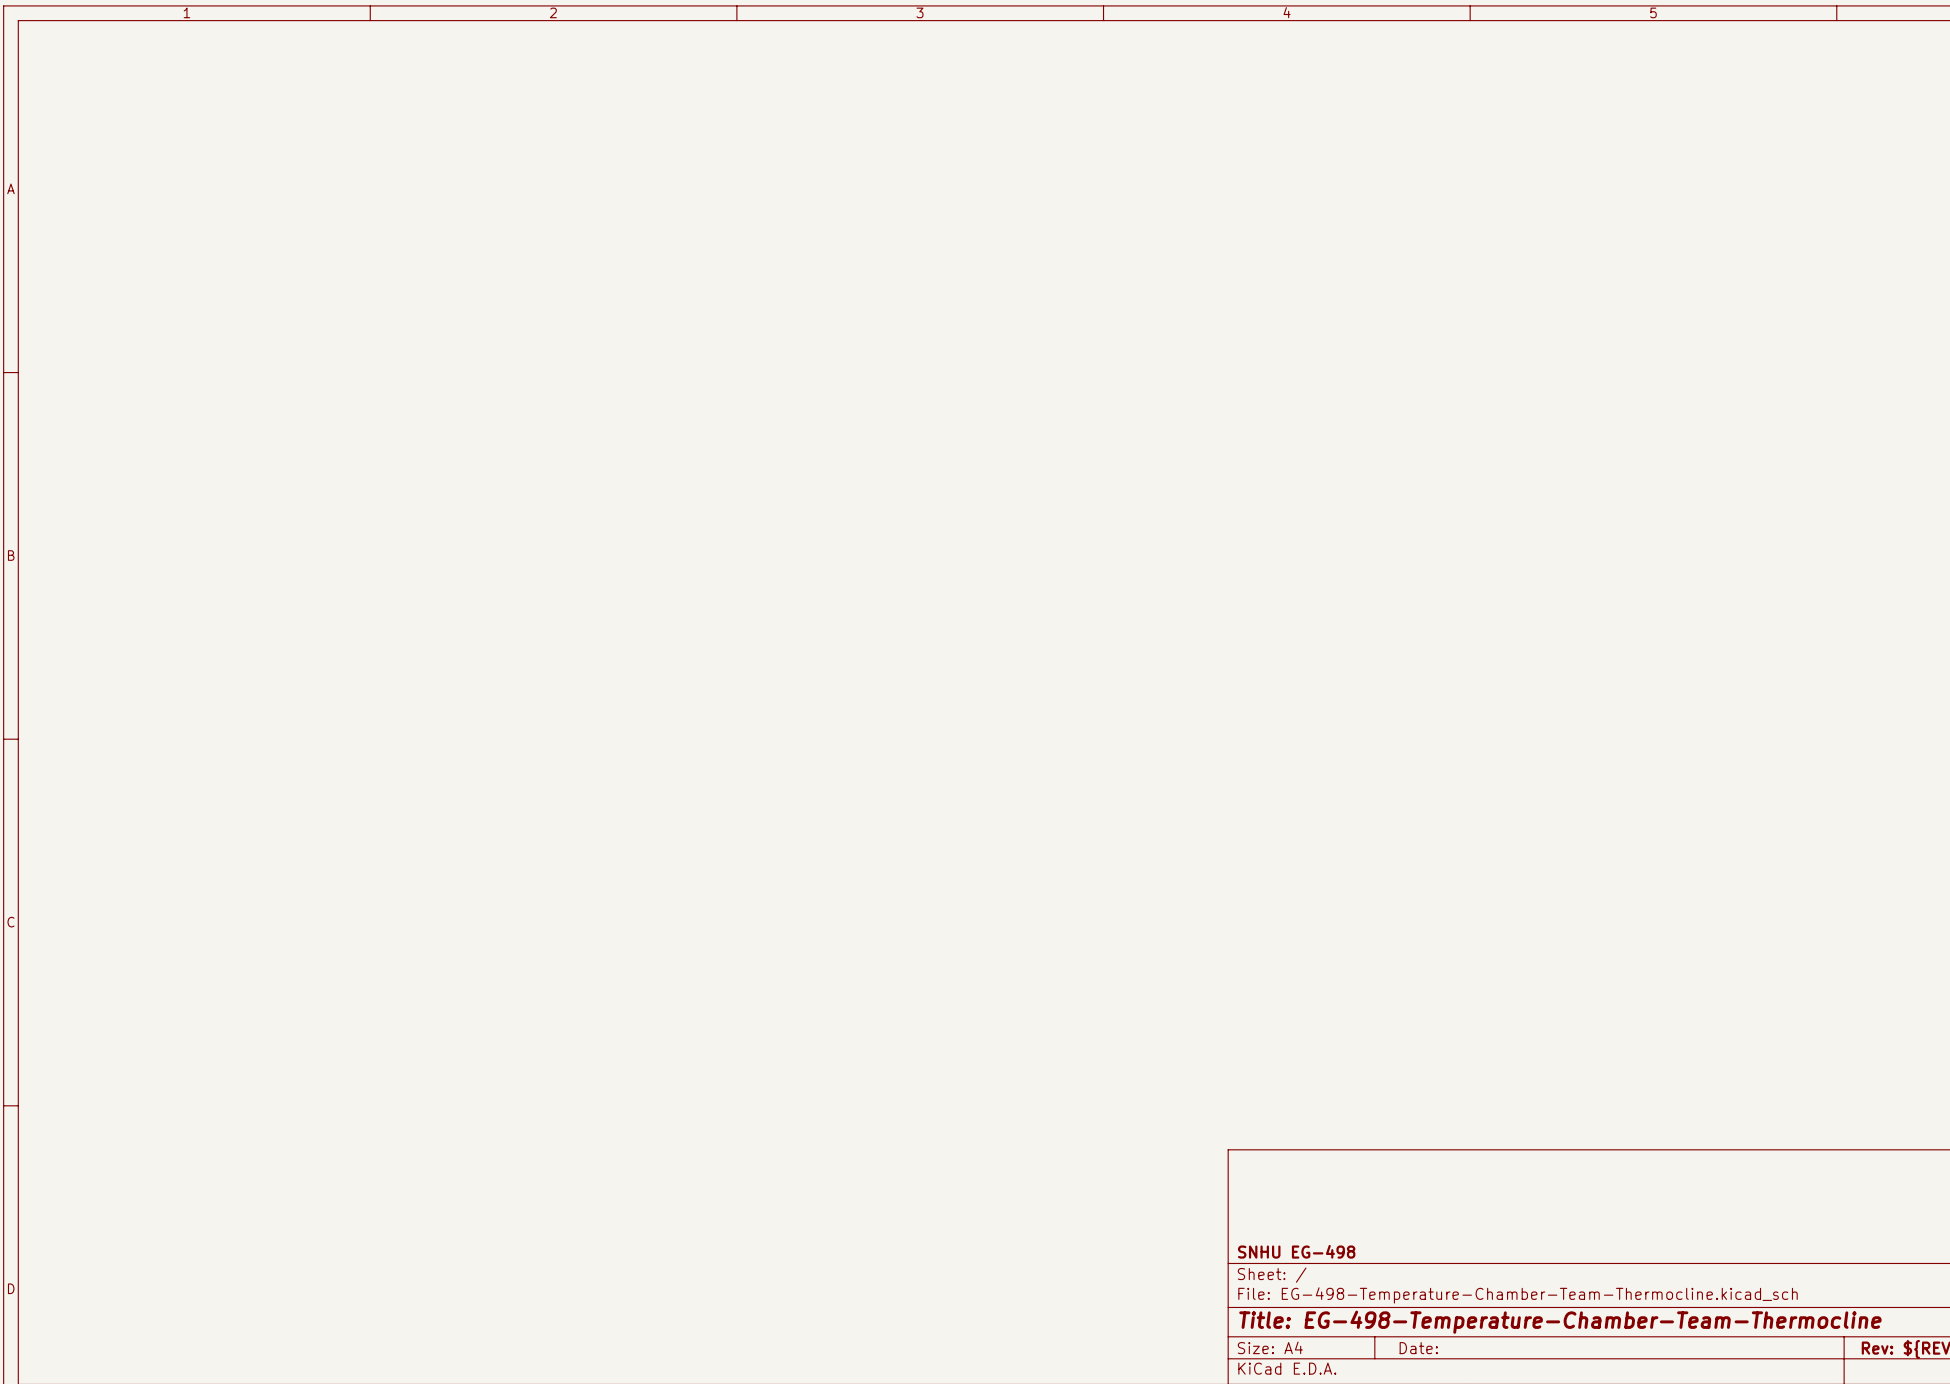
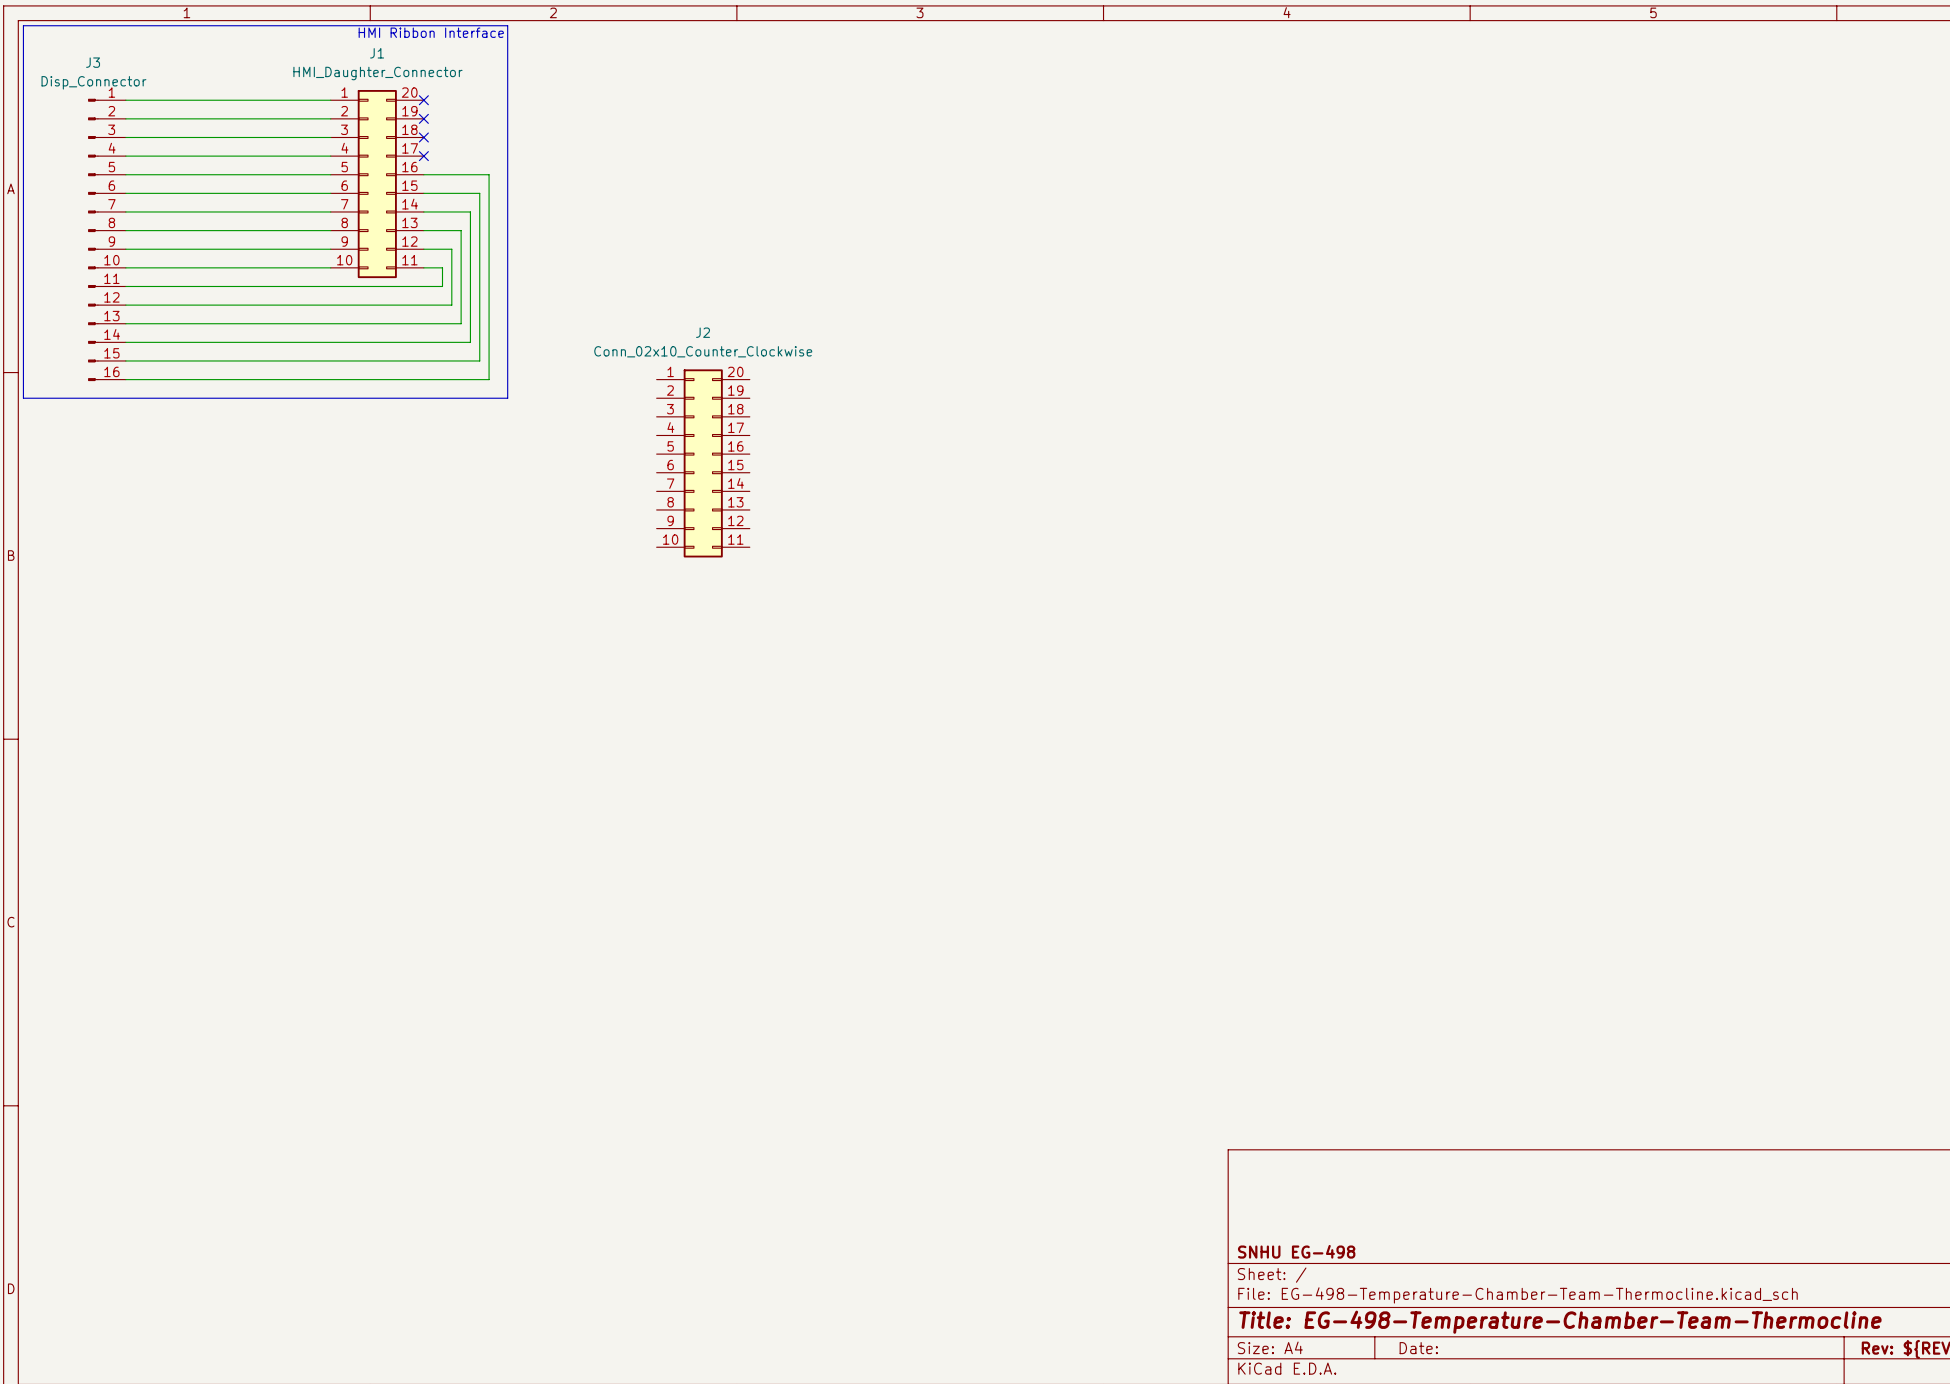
line: none -> (23, 25) (507, 25) (507, 398) (23, 398) (23, 25)
text: none -> HMI Ribbon Interface (431, 32)
wire: none -> (125, 100) (330, 100)
no-connect mark: none -> (423, 100)
wire: none -> (125, 118) (330, 118)
no-connect mark: none -> (423, 118)
wire: none -> (125, 137) (330, 137)
no-connect mark: none -> (423, 137)
wire: none -> (125, 156) (330, 156)
no-connect mark: none -> (423, 156)
wire: none -> (125, 174) (330, 174)
wire: none -> (423, 174) (489, 174) (489, 379) (125, 379)
J1: none -> HMI_Daughter_Connector (377, 184)
wire: none -> (125, 193) (330, 193)
wire: none -> (423, 193) (479, 193) (479, 360) (125, 360)
wire: none -> (125, 211) (330, 211)
wire: none -> (423, 211) (470, 211) (470, 342) (125, 342)
wire: none -> (125, 230) (330, 230)
wire: none -> (423, 230) (461, 230) (461, 323) (125, 323)
J3: none -> Disp_Connector (106, 239)
wire: none -> (125, 249) (330, 249)
wire: none -> (423, 249) (451, 249) (451, 305) (125, 305)
wire: none -> (125, 267) (330, 267)
wire: none -> (423, 267) (442, 267) (442, 286) (125, 286)
J2: none -> Conn_02x10_Counter_Clockwise (703, 463)

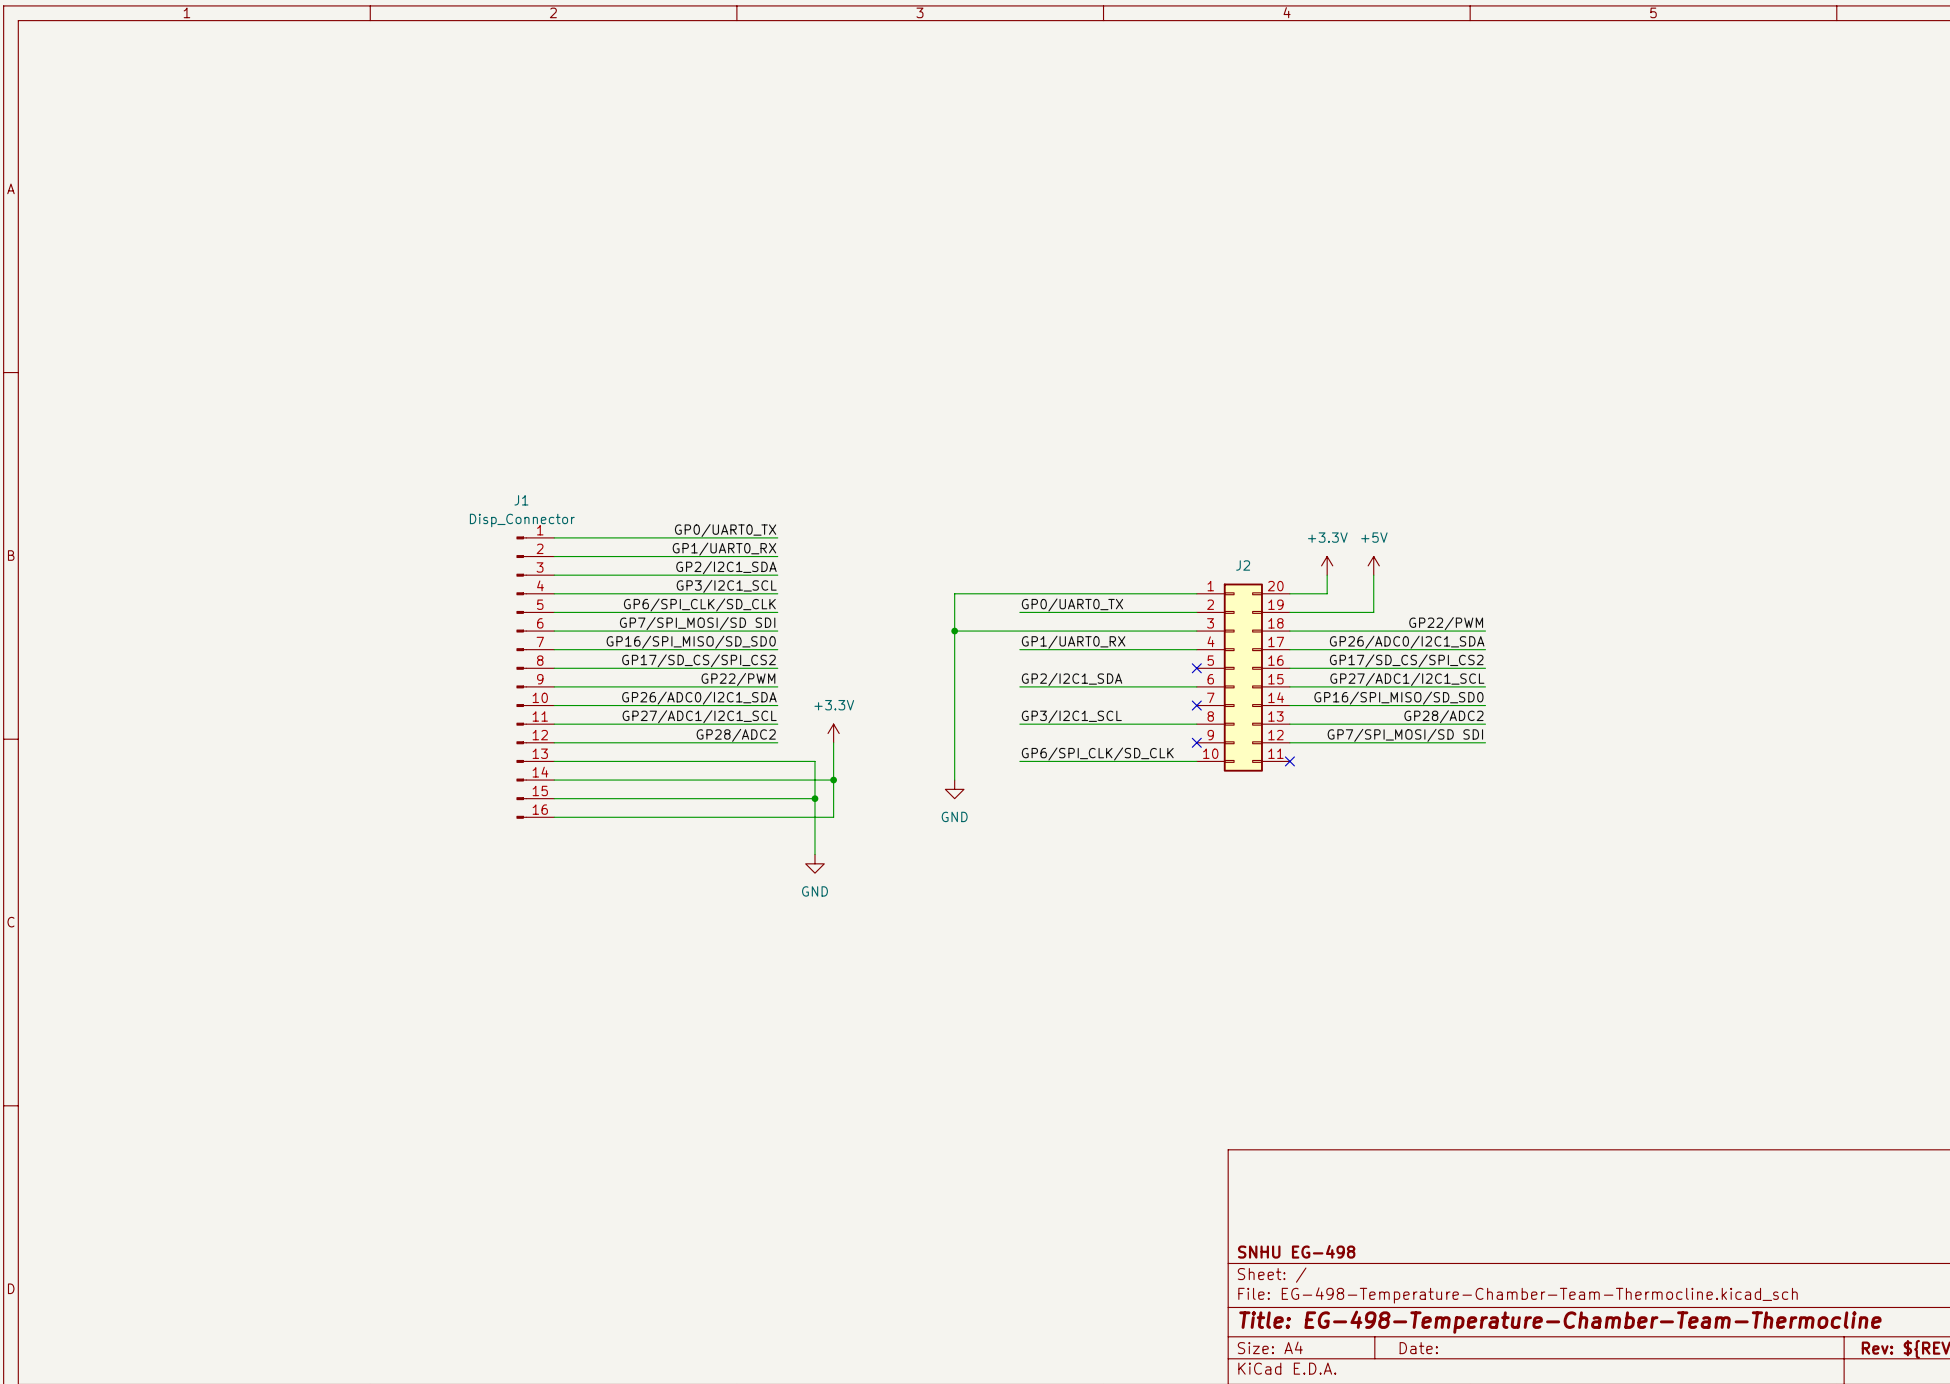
line: (23, 25) (507, 25) (507, 398) (23, 398) (23, 25) -> none
text: HMI Ribbon Interface (431, 32) -> none
J1 name position: J1 (377, 53) -> J1 (521, 500)
J1 value: HMI_Daughter_Connector (377, 73) -> Disp_Connector (522, 520)
J1 symbol: [330, 89, 424, 279] -> [516, 536, 555, 819]
wire: (125, 100) (330, 100) -> none
no-connect mark: (423, 100) -> none
wire: (125, 118) (330, 118) -> none
no-connect mark: (423, 118) -> none
wire: (125, 137) (330, 137) -> none
no-connect mark: (423, 137) -> none
wire: (125, 156) (330, 156) -> none
no-connect mark: (423, 156) -> none
wire: (125, 174) (330, 174) -> none
wire: (423, 174) (489, 174) (489, 379) (125, 379) -> none
wire: (125, 193) (330, 193) -> none
wire: (423, 193) (479, 193) (479, 360) (125, 360) -> none
wire: (125, 211) (330, 211) -> none
wire: (423, 211) (470, 211) (470, 342) (125, 342) -> none
wire: (125, 230) (330, 230) -> none
wire: (423, 230) (461, 230) (461, 323) (125, 323) -> none
J3: Disp_Connector (106, 239) -> none
wire: (125, 249) (330, 249) -> none
wire: (423, 249) (451, 249) (451, 305) (125, 305) -> none
wire: (125, 267) (330, 267) -> none
wire: (423, 267) (442, 267) (442, 286) (125, 286) -> none
J2 name position: J2 (703, 332) -> J2 (1243, 565)
J2 value: Conn_02x10_Counter_Clockwise (703, 351) -> none
J2 position: (703, 463) -> (1243, 677)
label: none -> GP0/UART0_TX (725, 530)
wire: none -> (554, 537) (777, 537)
label: none -> GP1/UART0_RX (724, 549)
wire: none -> (554, 556) (777, 556)
power symbol: none -> +3.3V (1327, 565)
power symbol: none -> +5V (1373, 565)
label: none -> GP2/I2C1_SDA (726, 567)
wire: none -> (554, 575) (777, 575)
wire: none -> (1327, 575) (1327, 593) (1289, 593)
wire: none -> (1373, 575) (1373, 612) (1289, 612)
label: none -> GP3/I2C1_SCL (726, 586)
wire: none -> (554, 593) (777, 593)
wire: none -> (1196, 593) (954, 593) (954, 780)
label: none -> GP6/SPI_CLK/SD_CLK (699, 604)
label: none -> GP0/UART0_TX (1072, 604)
wire: none -> (554, 612) (777, 612)
wire: none -> (1019, 612) (1196, 612)
label: none -> GP7/SPI_MOSI/SD SDI (697, 623)
label: none -> GP22/PWM (1446, 623)
wire: none -> (554, 631) (777, 631)
wire: none -> (954, 631) (1196, 631)
junction: none -> (954, 631)
wire: none -> (1289, 631) (1485, 631)
label: none -> GP16/SPI_MISO/SD_SD0 (691, 642)
label: none -> GP1/UART0_RX (1073, 642)
label: none -> GP26/ADC0/I2C1_SDA (1407, 642)
wire: none -> (554, 649) (777, 649)
wire: none -> (1019, 649) (1196, 649)
wire: none -> (1289, 649) (1485, 649)
label: none -> GP17/SD_CS/SPI_CS2 (698, 660)
label: none -> GP17/SD_CS/SPI_CS2 (1406, 660)
wire: none -> (554, 668) (777, 668)
no-connect mark: none -> (1196, 668)
wire: none -> (1289, 668) (1485, 668)
label: none -> GP22/PWM (738, 679)
label: none -> GP2/I2C1_SDA (1072, 679)
label: none -> GP27/ADC1/I2C1_SCL (1407, 679)
wire: none -> (554, 686) (777, 686)
wire: none -> (1019, 686) (1196, 686)
wire: none -> (1289, 686) (1485, 686)
label: none -> GP26/ADC0/I2C1_SDA (699, 698)
label: none -> GP16/SPI_MISO/SD_SD0 (1398, 698)
wire: none -> (554, 705) (777, 705)
no-connect mark: none -> (1196, 705)
wire: none -> (1289, 705) (1485, 705)
label: none -> GP27/ADC1/I2C1_SCL (699, 716)
label: none -> GP3/I2C1_SCL (1071, 716)
label: none -> GP28/ADC2 (1443, 716)
wire: none -> (554, 724) (777, 724)
wire: none -> (1019, 724) (1196, 724)
wire: none -> (1289, 724) (1485, 724)
power symbol: none -> +3.3V (833, 733)
label: none -> GP28/ADC2 (736, 735)
label: none -> GP7/SPI_MOSI/SD SDI (1405, 735)
wire: none -> (554, 742) (777, 742)
wire: none -> (833, 742) (833, 817) (554, 817)
no-connect mark: none -> (1196, 742)
wire: none -> (1289, 742) (1485, 742)
label: none -> GP6/SPI_CLK/SD_CLK (1097, 753)
wire: none -> (554, 761) (814, 761) (814, 854)
wire: none -> (1019, 761) (1196, 761)
no-connect mark: none -> (1289, 761)
wire: none -> (554, 780) (833, 780)
junction: none -> (833, 780)
power symbol: none -> GND (954, 789)
wire: none -> (554, 798) (814, 798)
junction: none -> (814, 798)
power symbol: none -> GND (814, 863)

